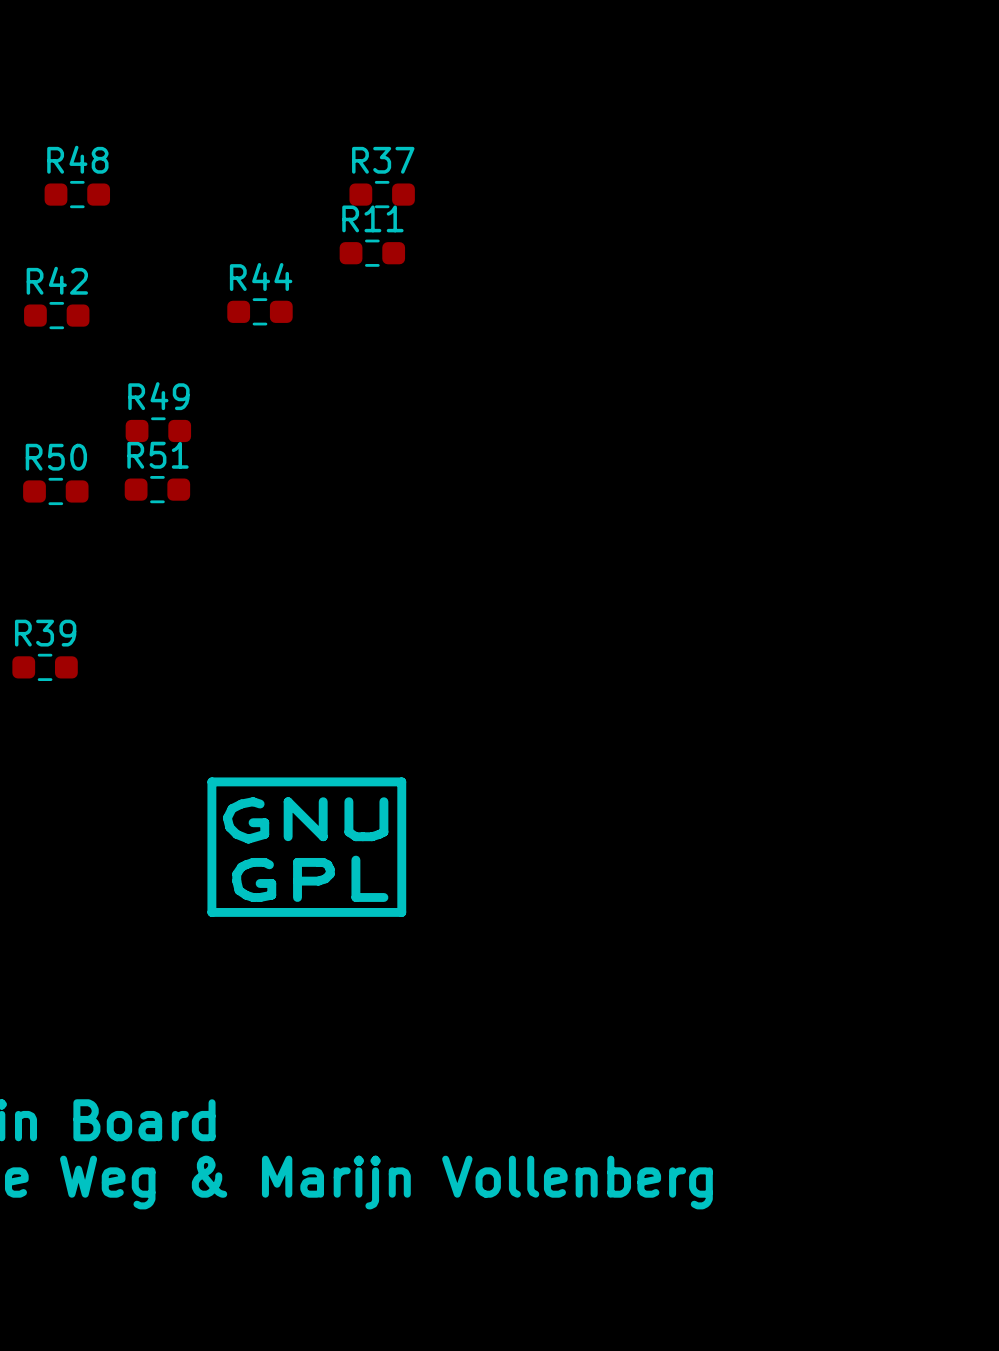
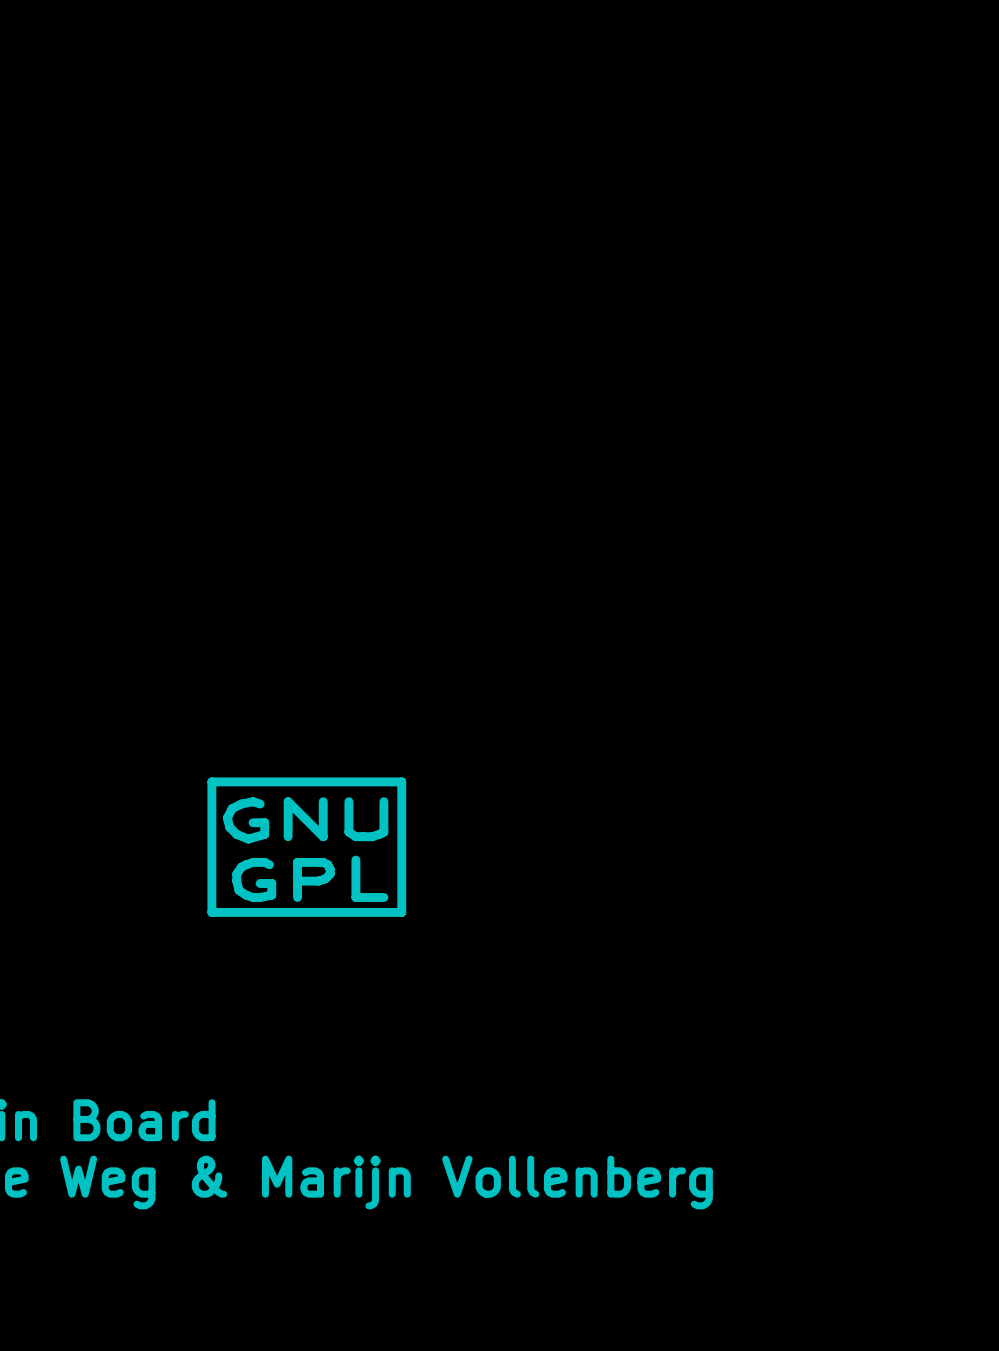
R48: (77, 194) -> none
R37: (382, 194) -> none
R11: (372, 253) -> none
R44: (259, 311) -> none
R42: (56, 315) -> none
R49: (158, 430) -> none
R51: (157, 489) -> none
R50: (55, 491) -> none
R39: (45, 667) -> none

